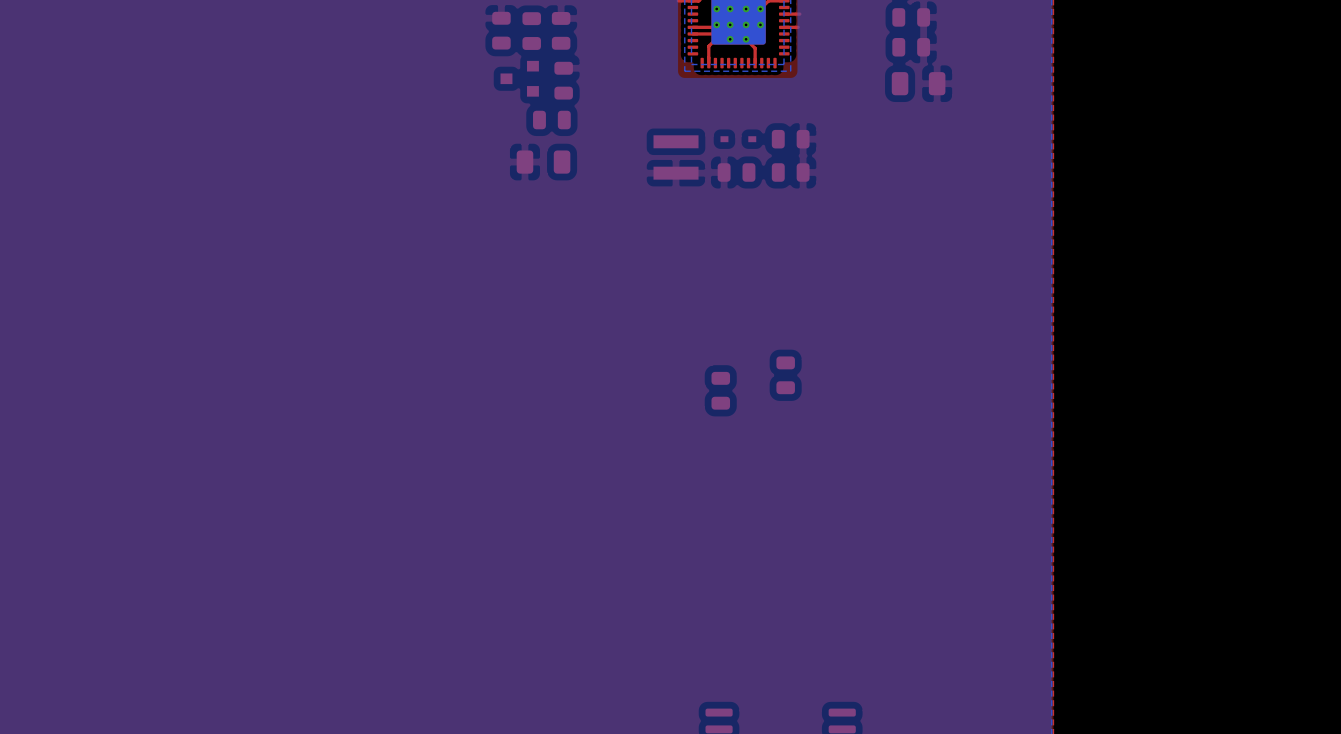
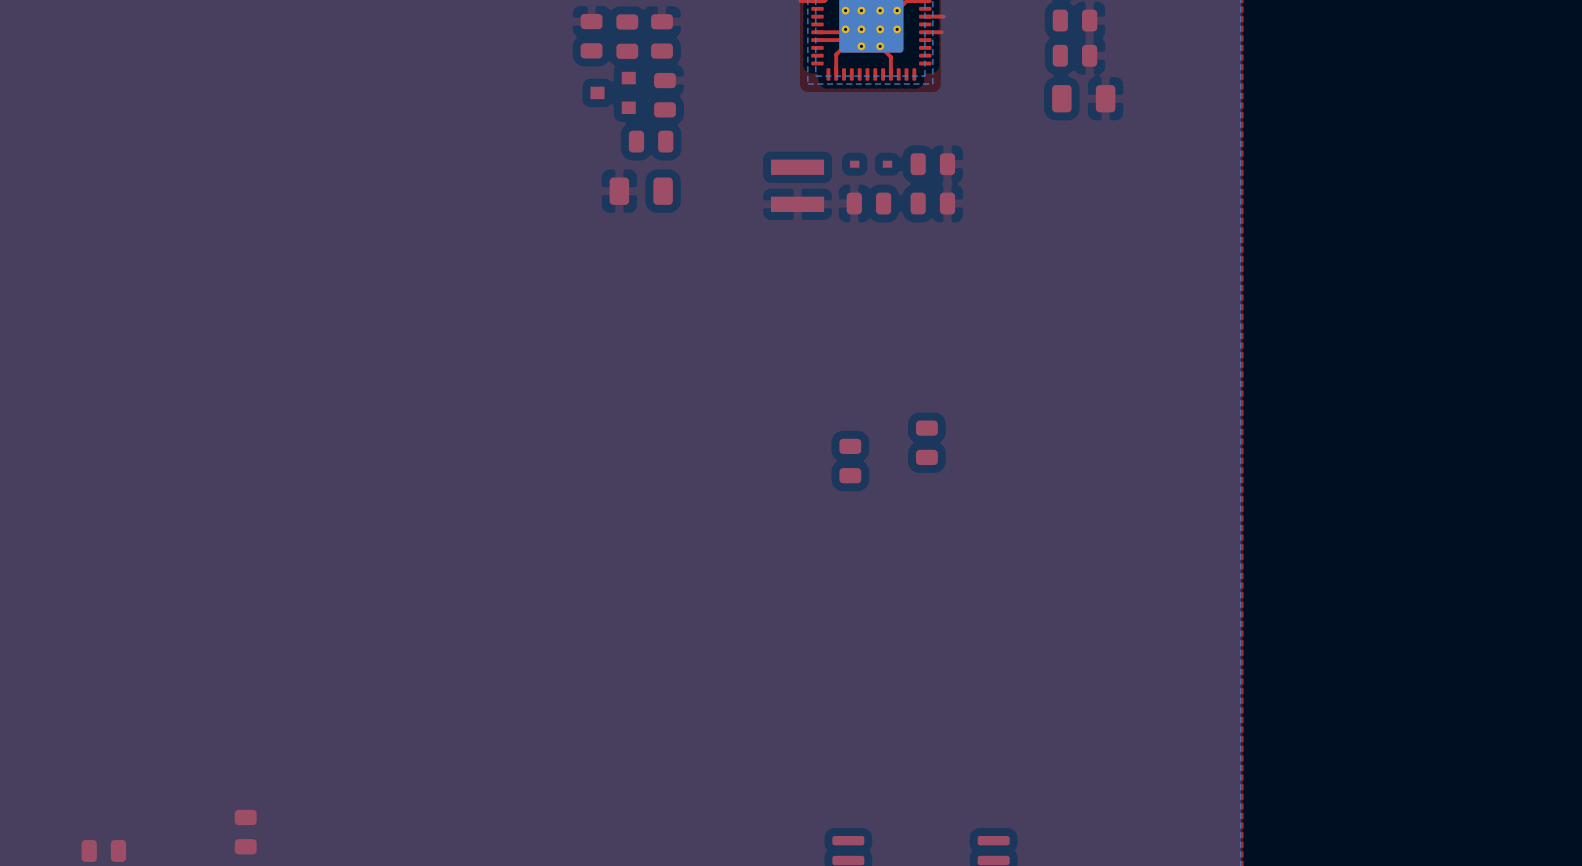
part: none -> (245, 832)
part: none -> (103, 850)

